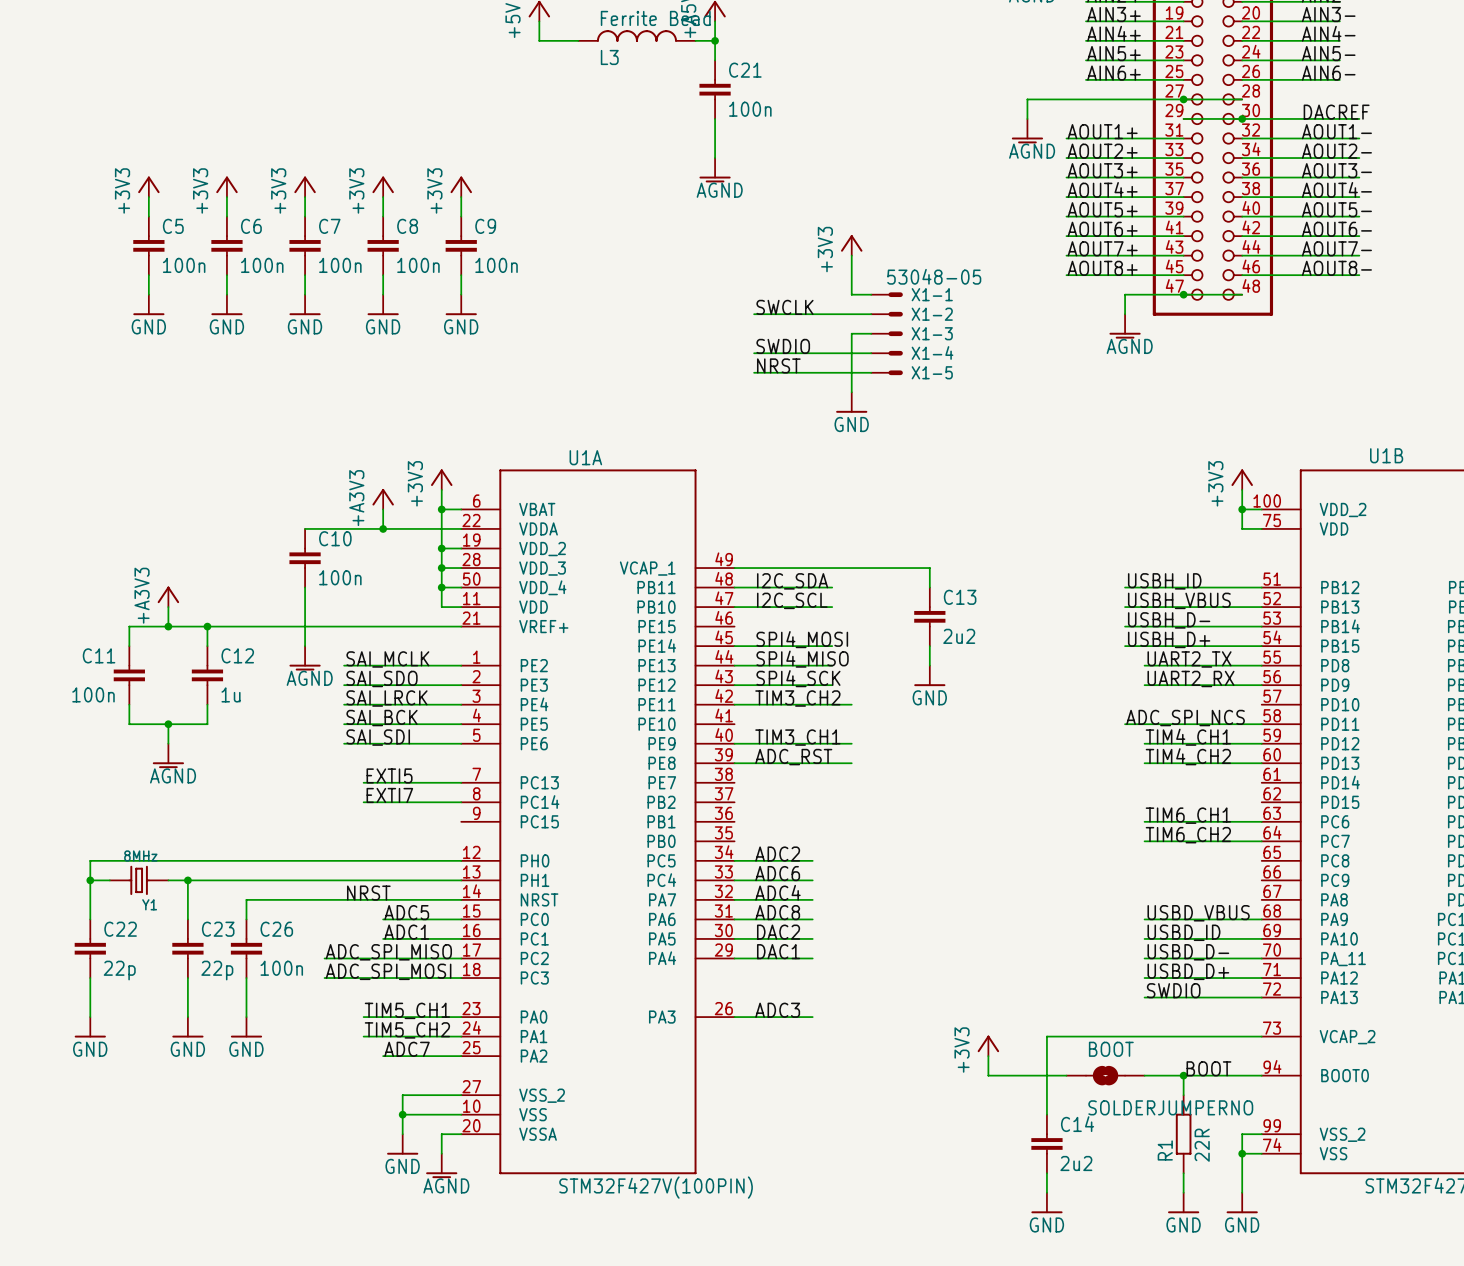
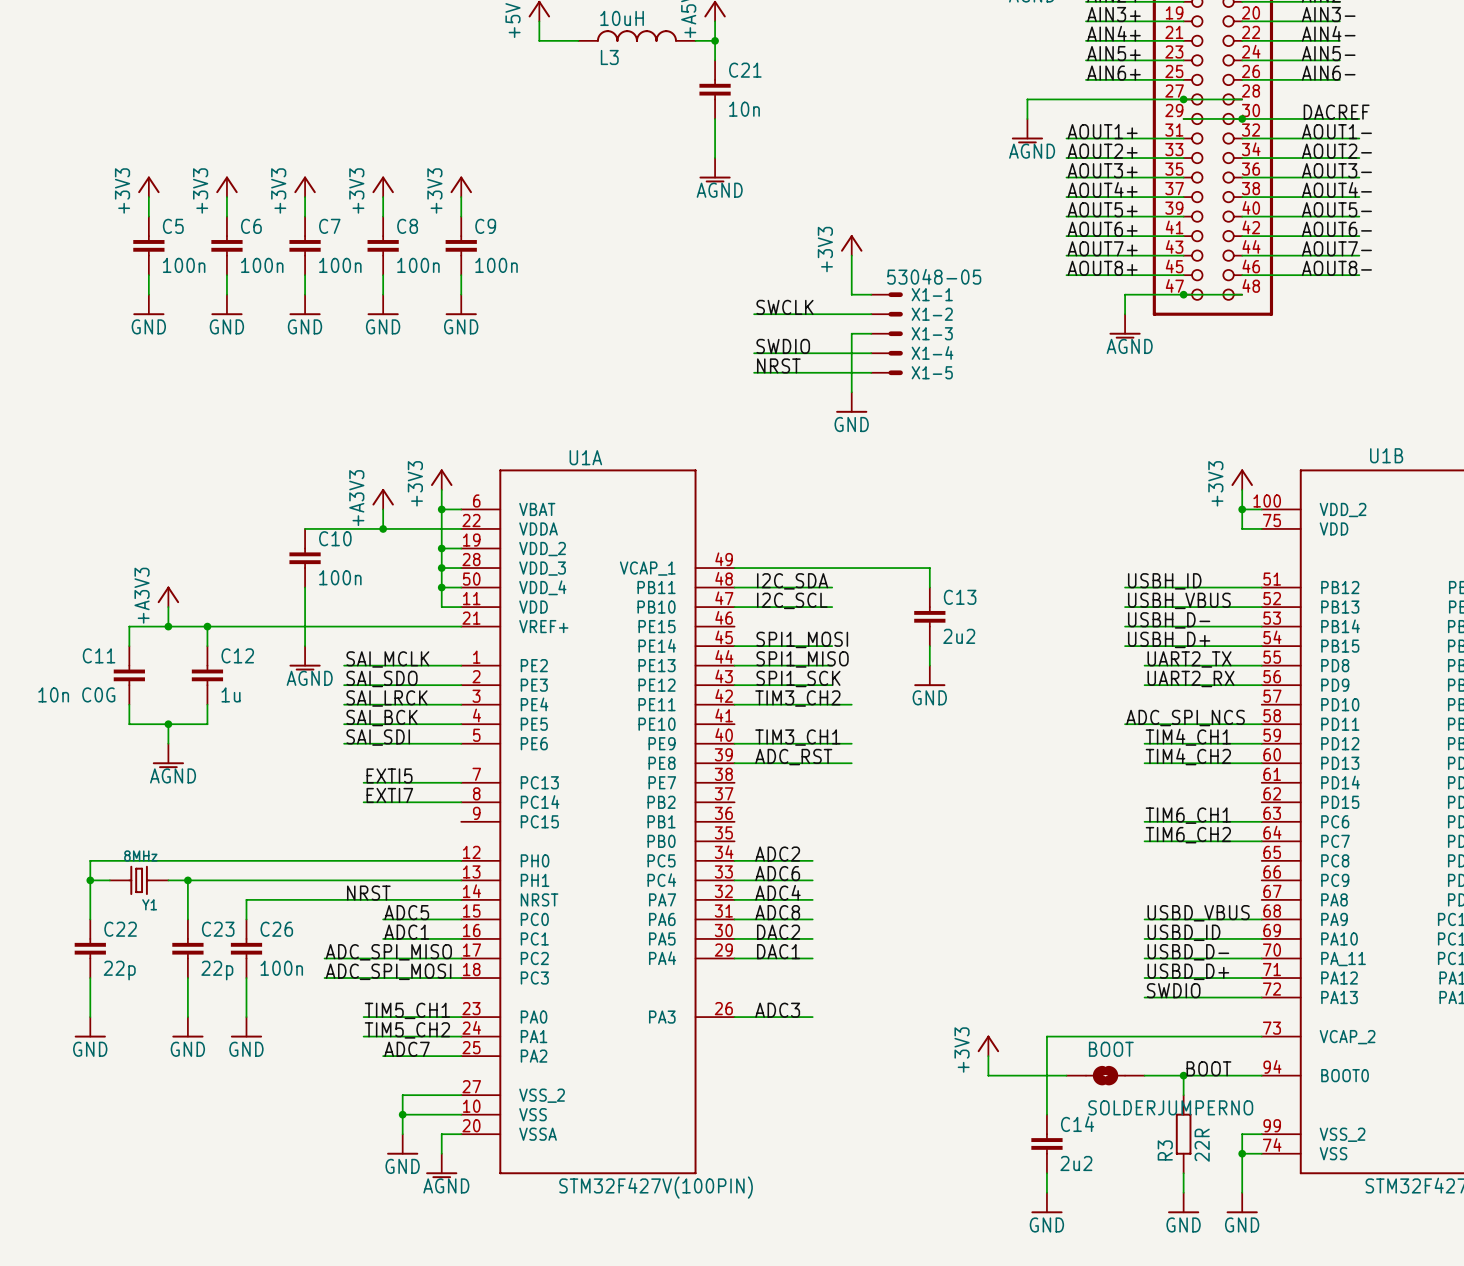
L3 value: Ferrite Bead (655, 18) -> 10uH (622, 18)
C21 value: 100n (750, 109) -> 10n (744, 109)
label: SPI4_MOSI (802, 639) -> SPI1_MOSI (802, 639)
label: SPI4_MISO (802, 659) -> SPI1_MISO (802, 659)
label: SPI4_SCK (798, 678) -> SPI1_SCK (798, 678)
C11 value: 100n (93, 694) -> 10n C0G (76, 694)
R1 name: R1 (1165, 1150) -> R3 (1165, 1150)

